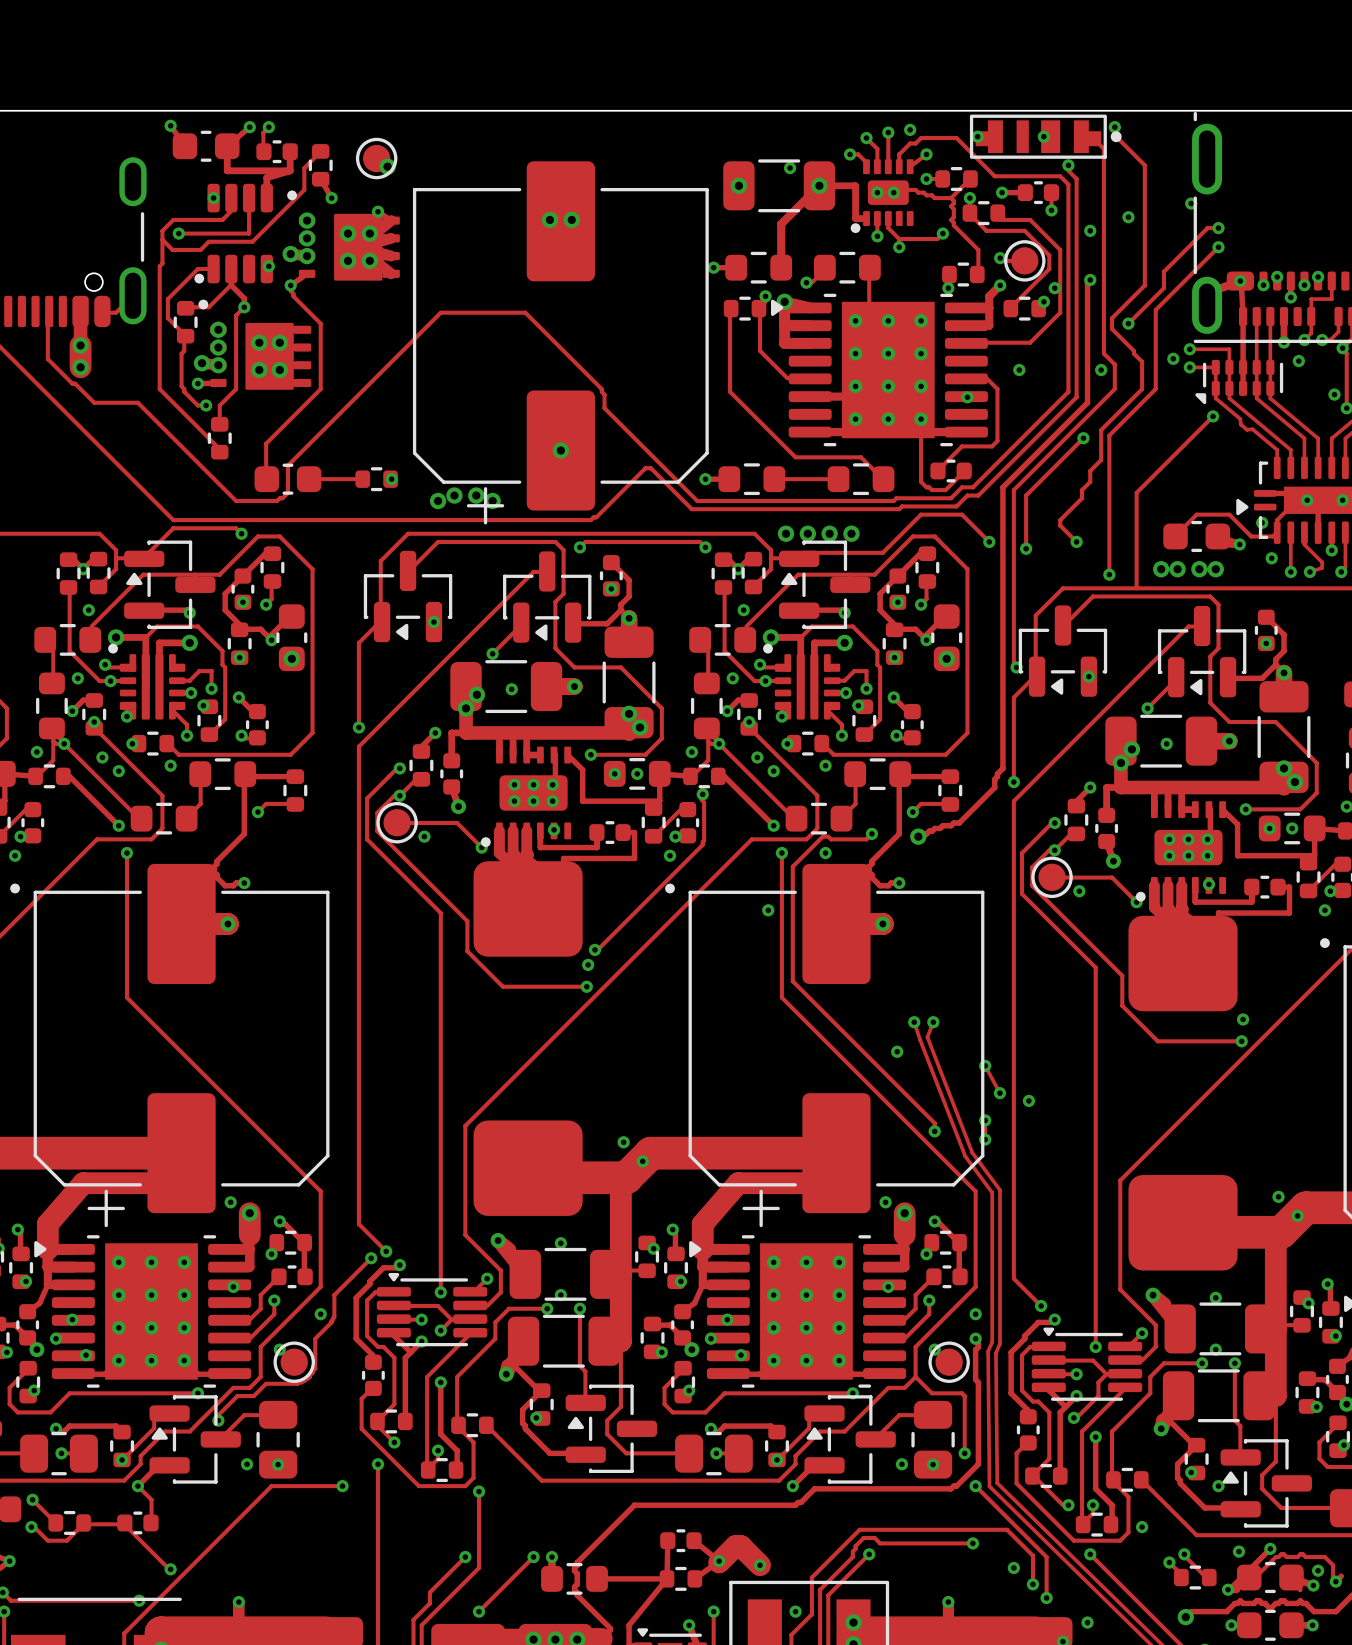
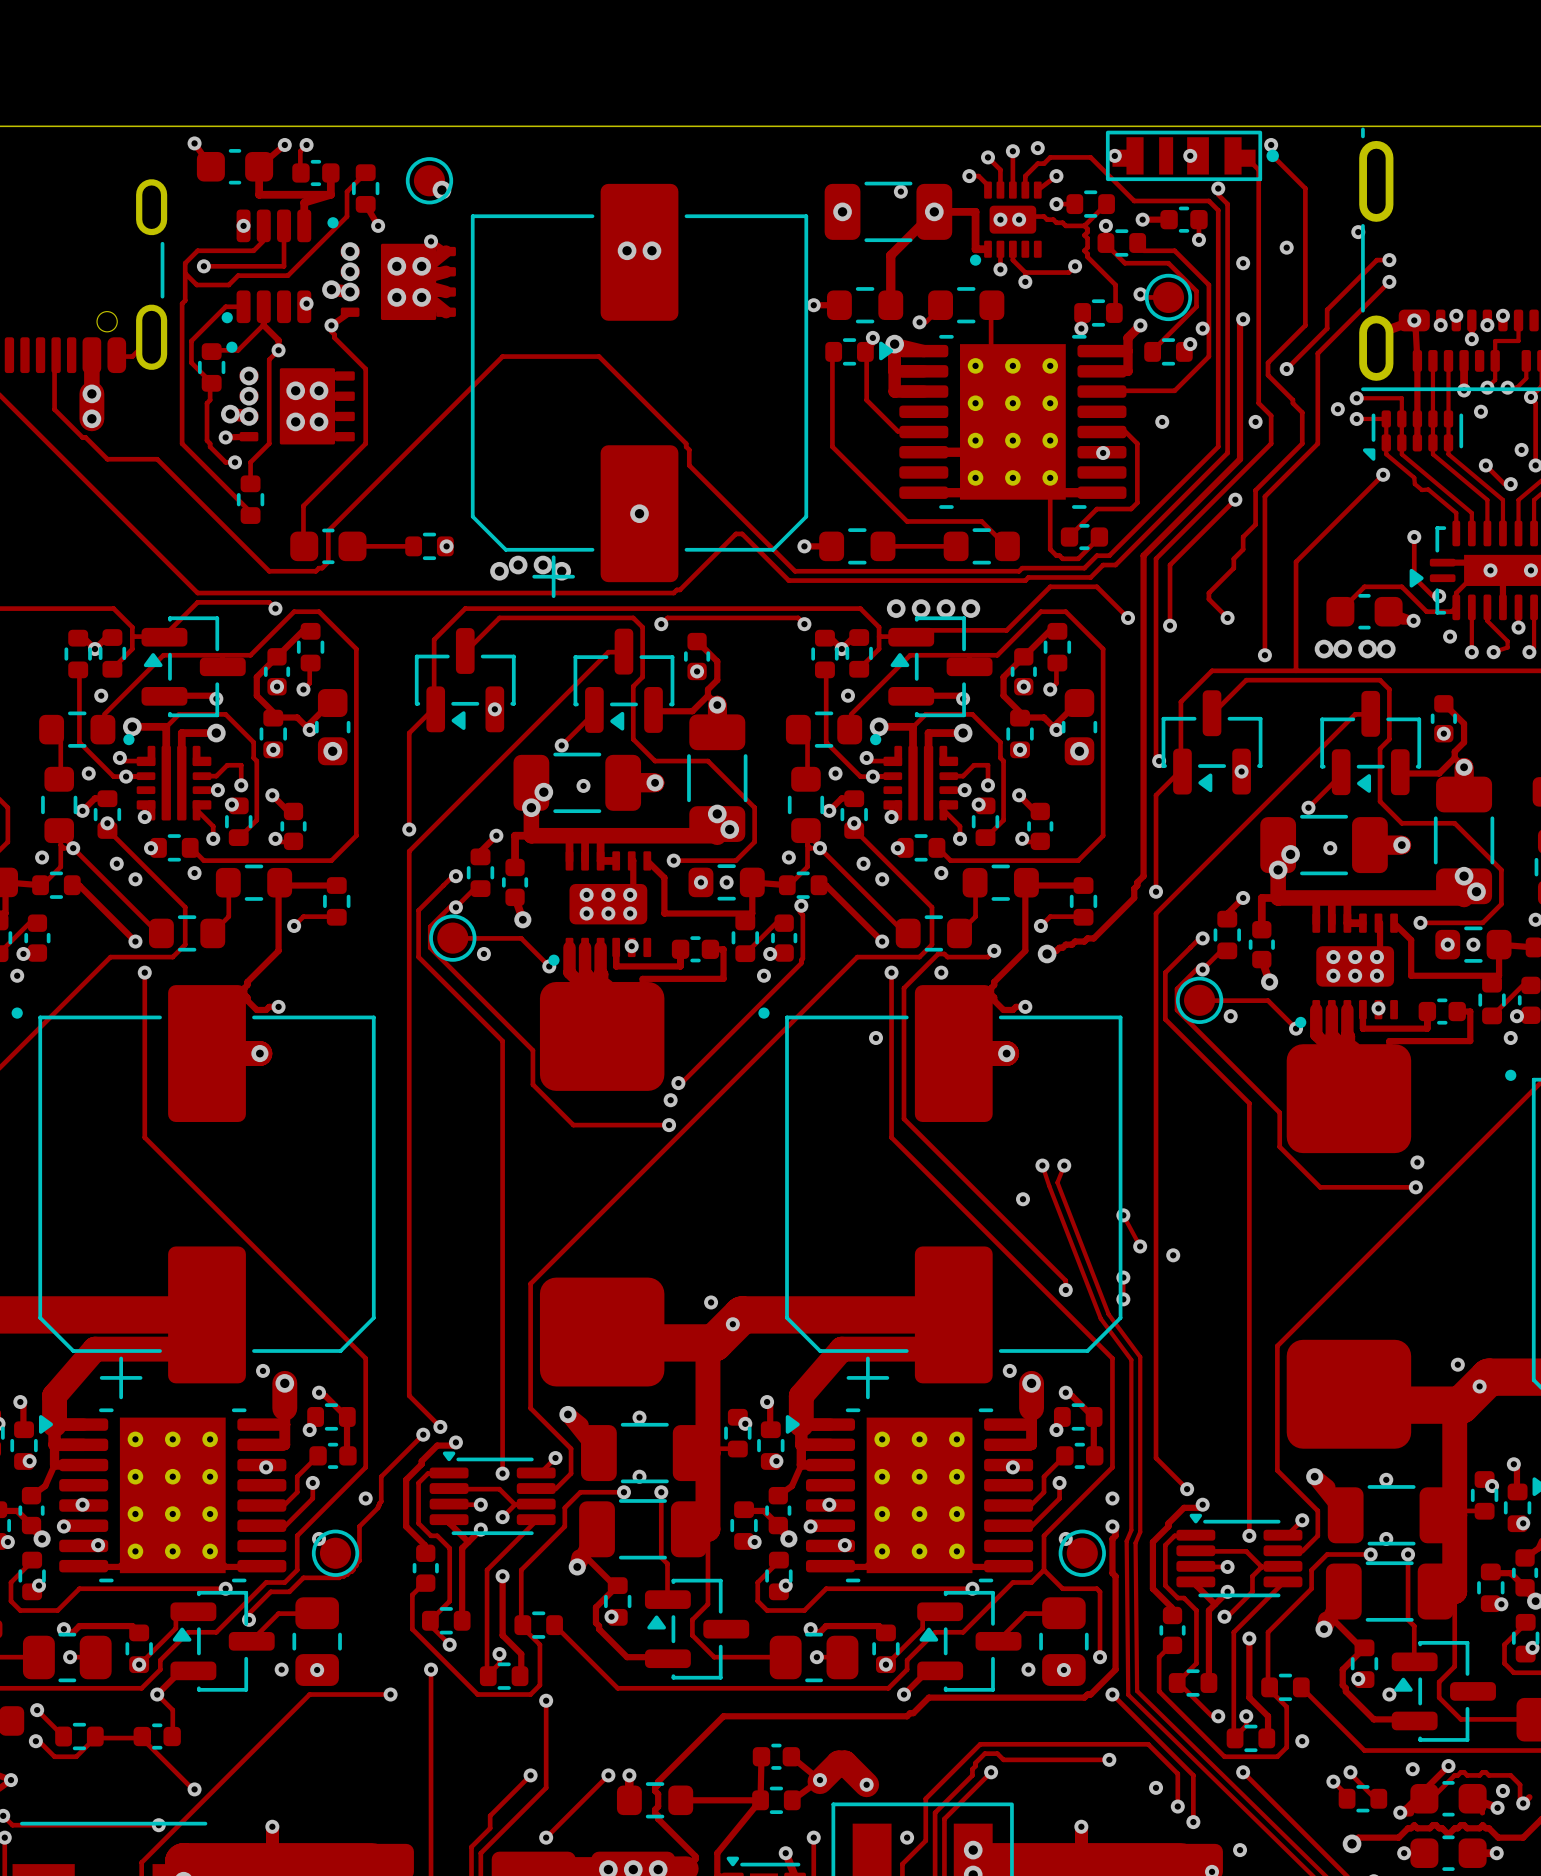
track: none -> (1485, 465) (1504, 484)
via: none -> (1485, 465)
via: none -> (1510, 484)
track: none -> (1414, 537) (1414, 577) (1432, 596)
via: none -> (1414, 537)

